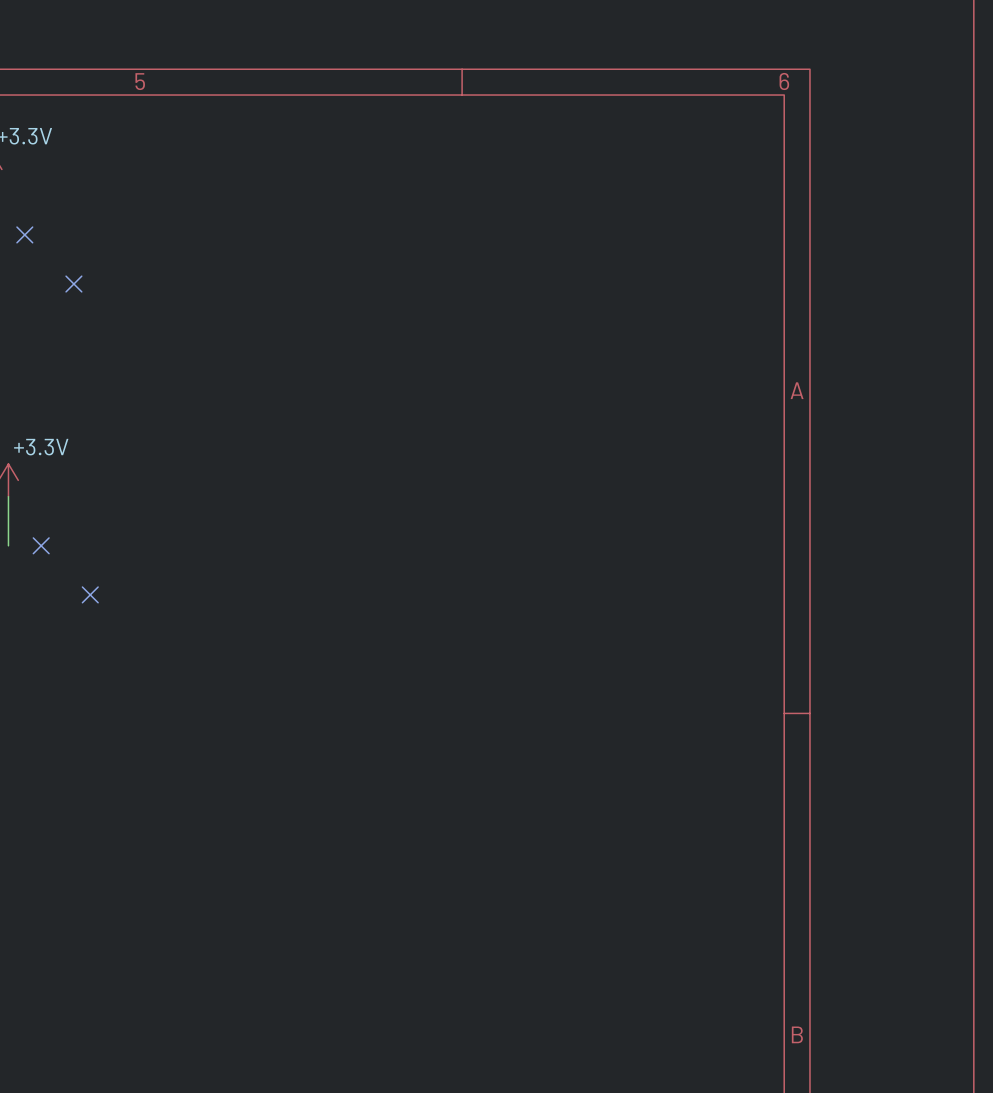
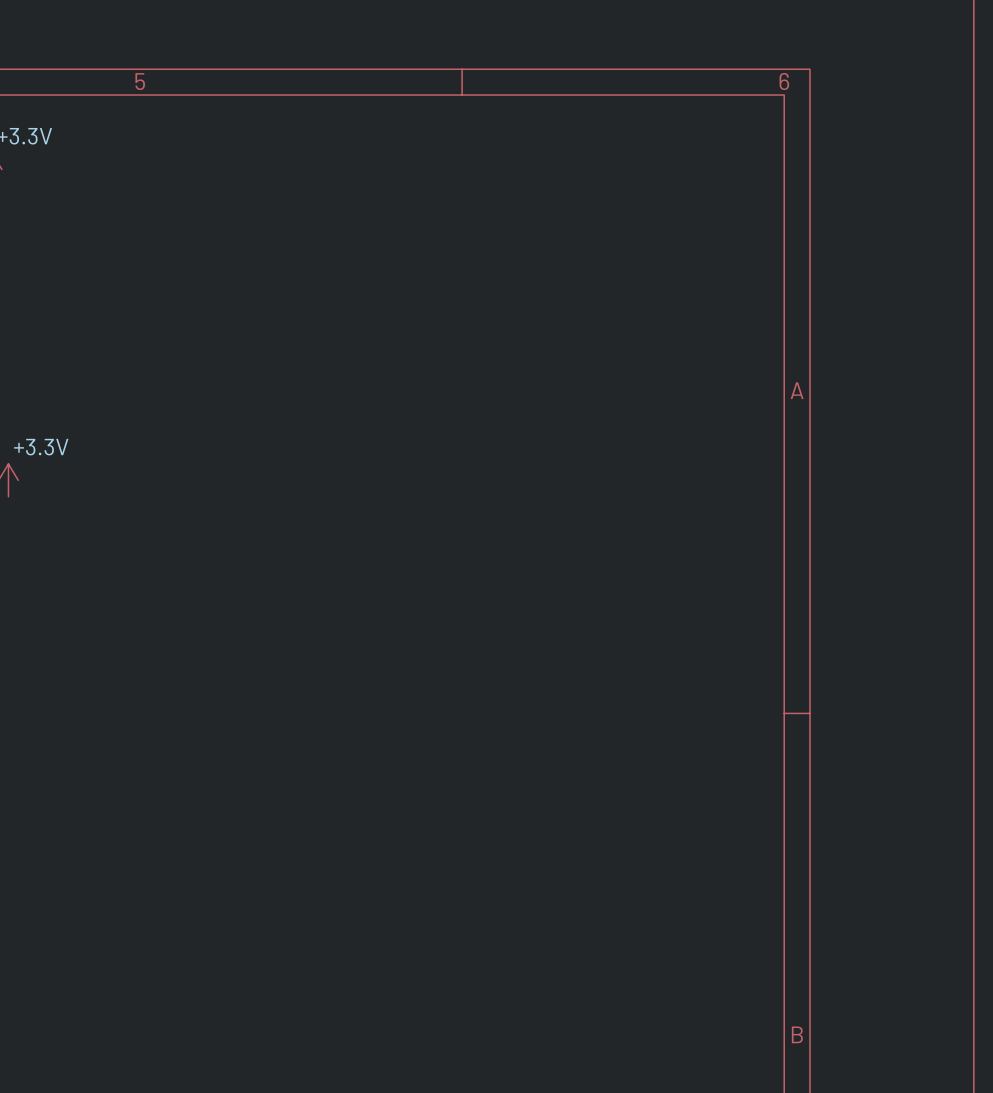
no-connect mark: (24, 234) -> none
no-connect mark: (73, 284) -> none
wire: (8, 496) (8, 545) -> none
no-connect mark: (41, 545) -> none
no-connect mark: (90, 594) -> none

